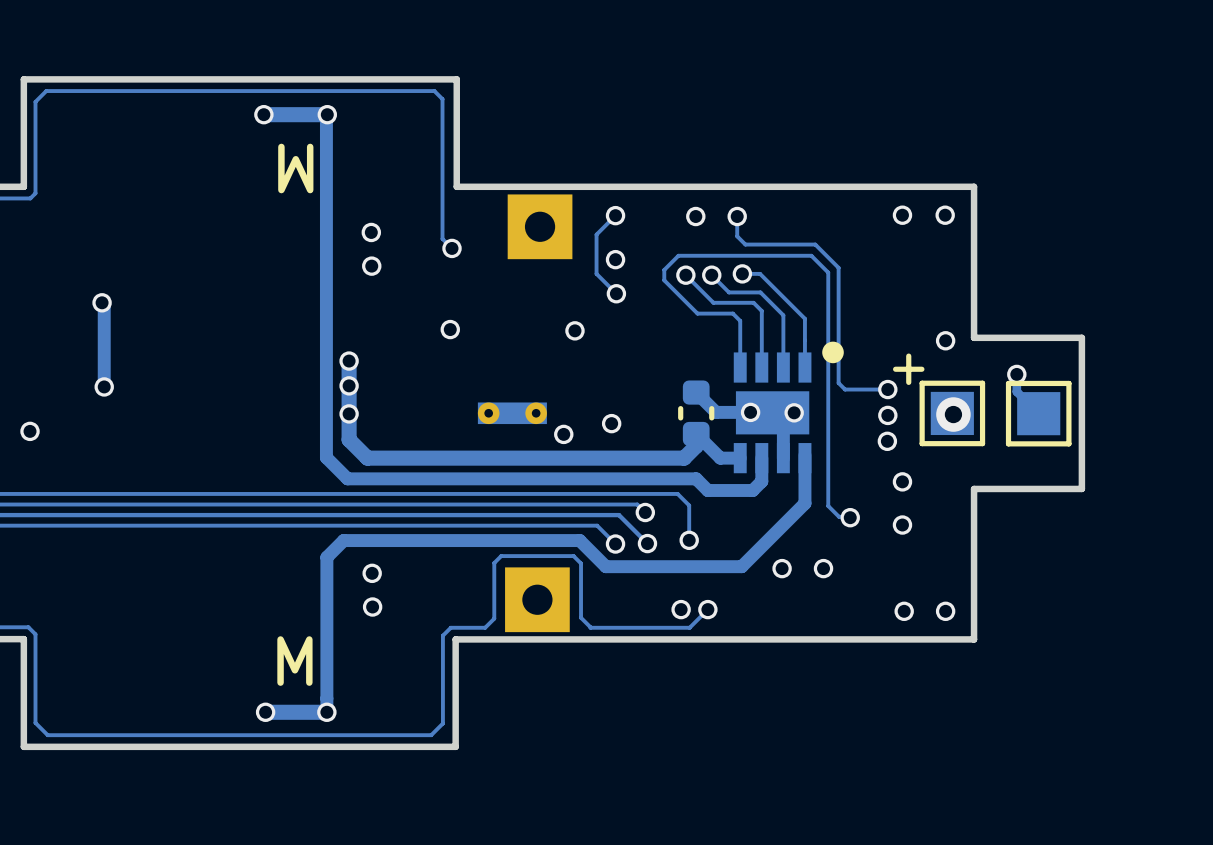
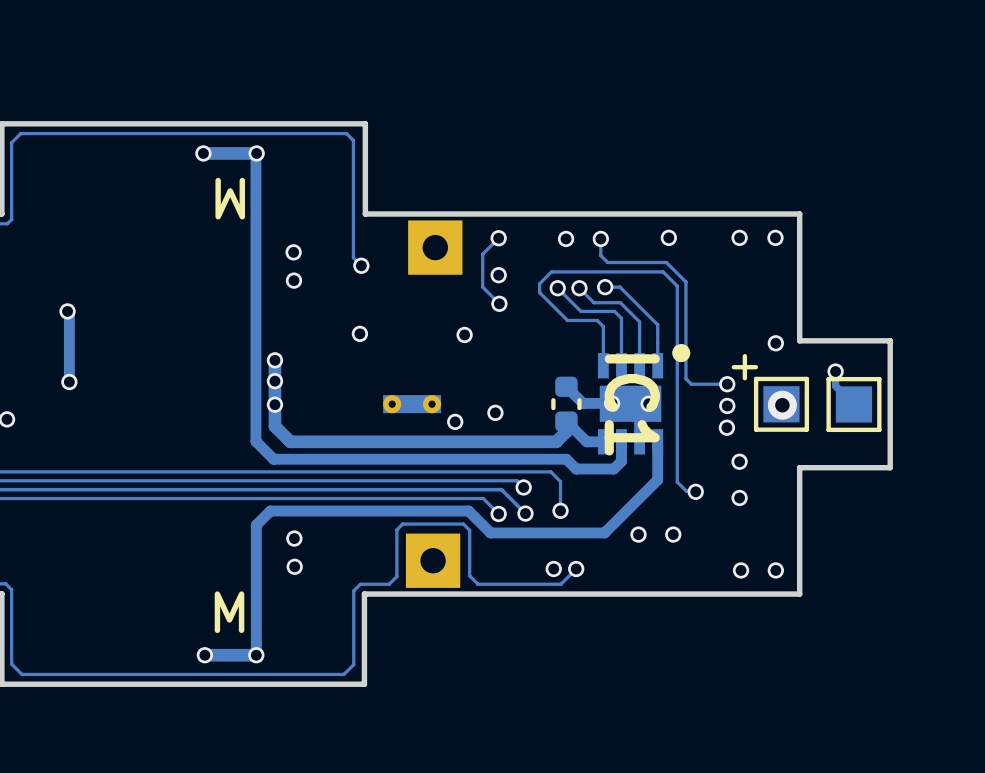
via: none -> (668, 237)
IC1 name: none -> IC1 (632, 404)

